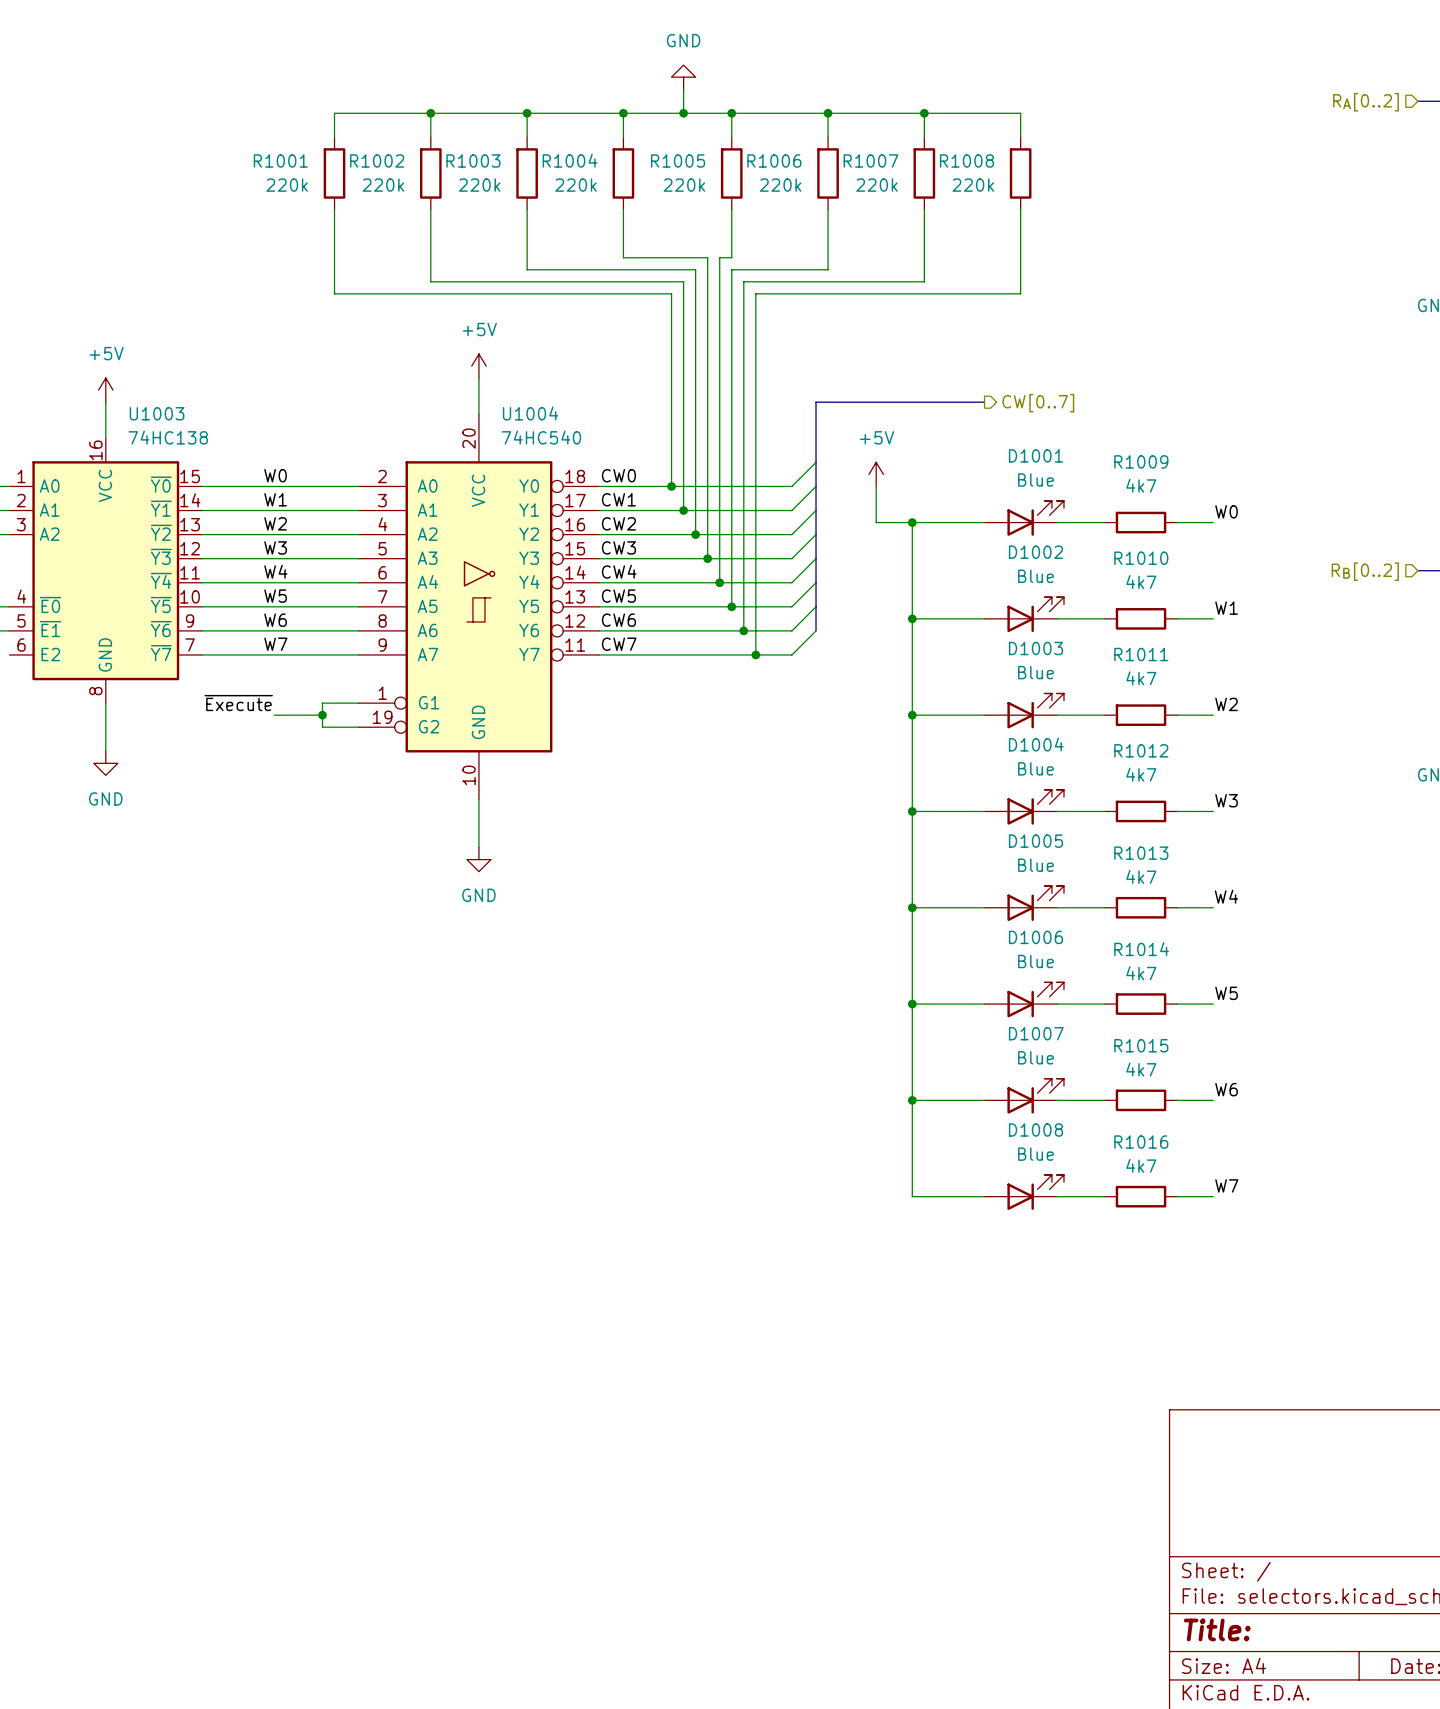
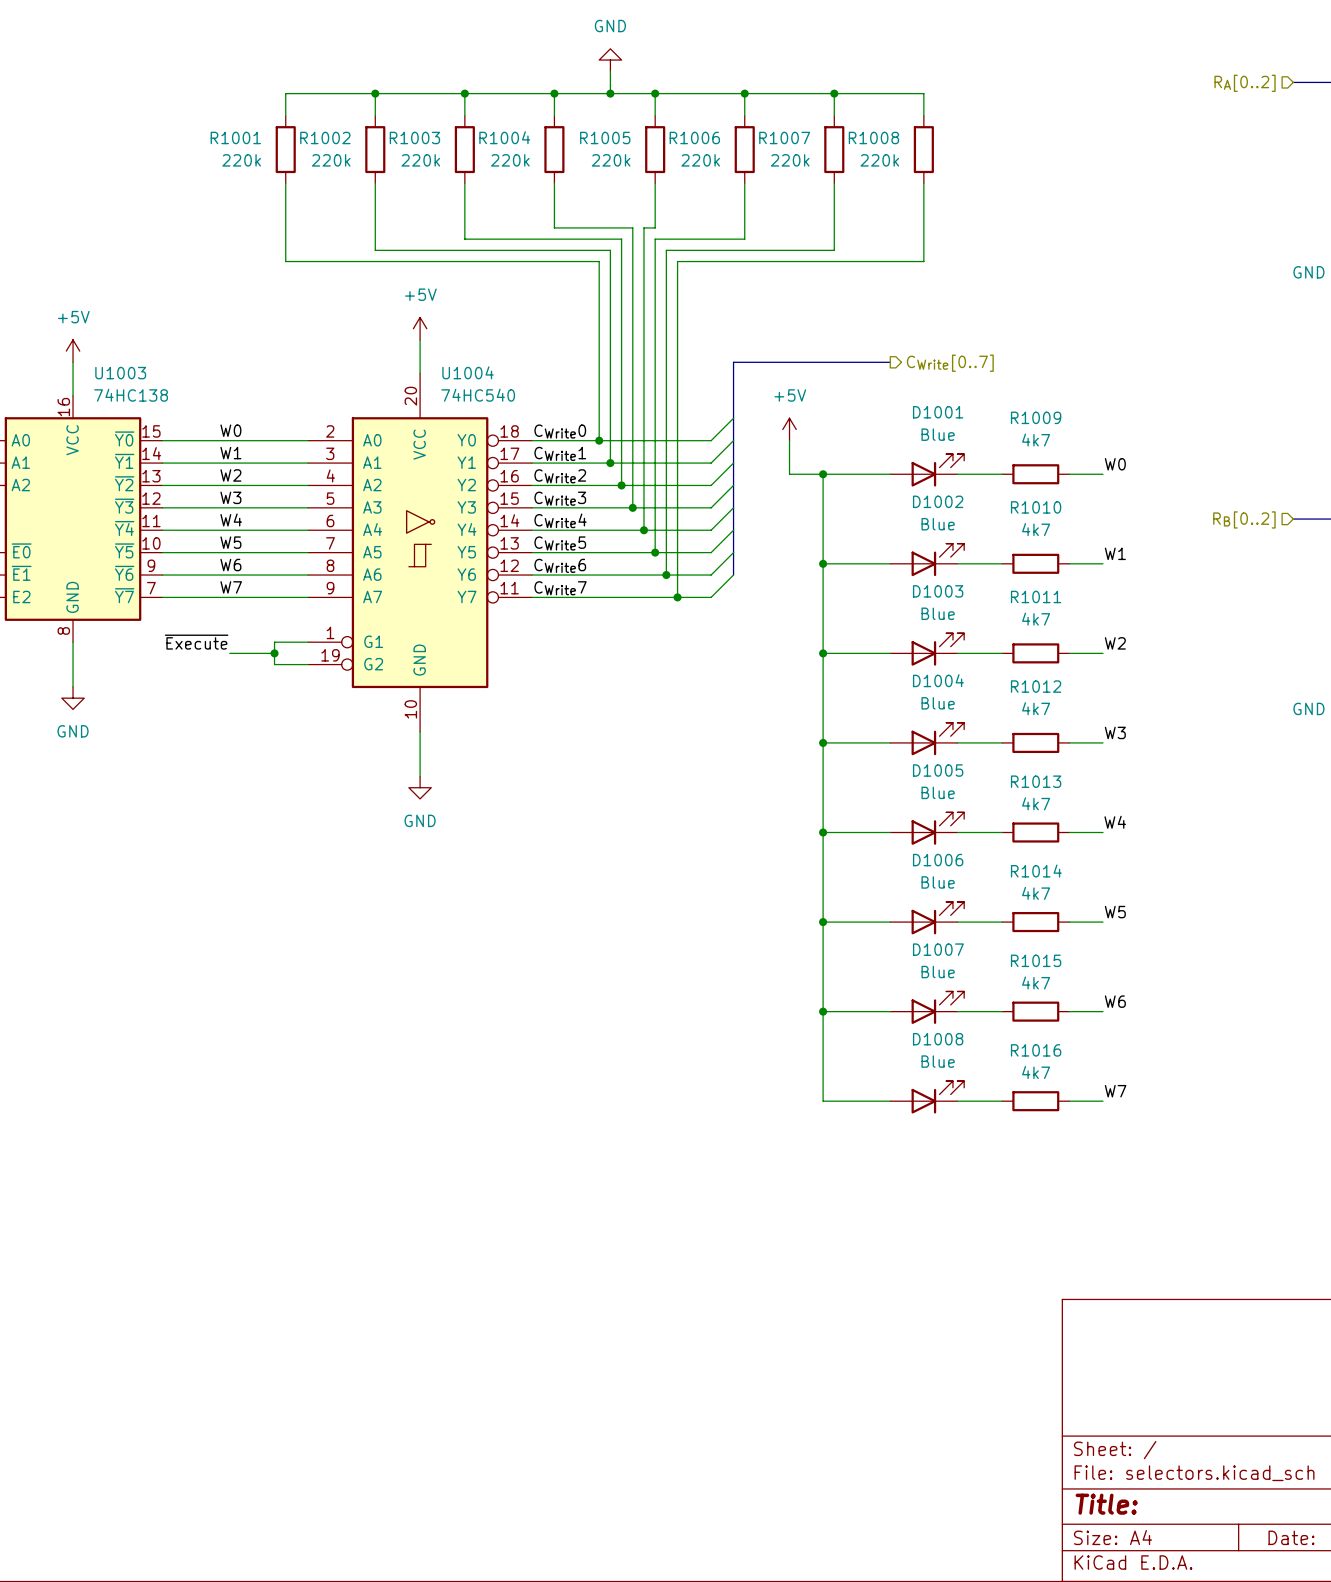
hierarchical label: CW[0..7] (1038, 403) -> CWrite[0..7] (950, 363)
label: CW0 (618, 475) -> CWrite0 (560, 431)
label: CW1 (618, 499) -> CWrite1 (560, 453)
label: CW2 (618, 523) -> CWrite2 (560, 476)
label: CW3 (618, 547) -> CWrite3 (560, 498)
label: CW4 (619, 571) -> CWrite4 (560, 520)
label: CW5 (618, 596) -> CWrite5 (560, 543)
label: CW6 (618, 620) -> CWrite6 (560, 565)
label: CW7 (619, 644) -> CWrite7 (560, 588)

